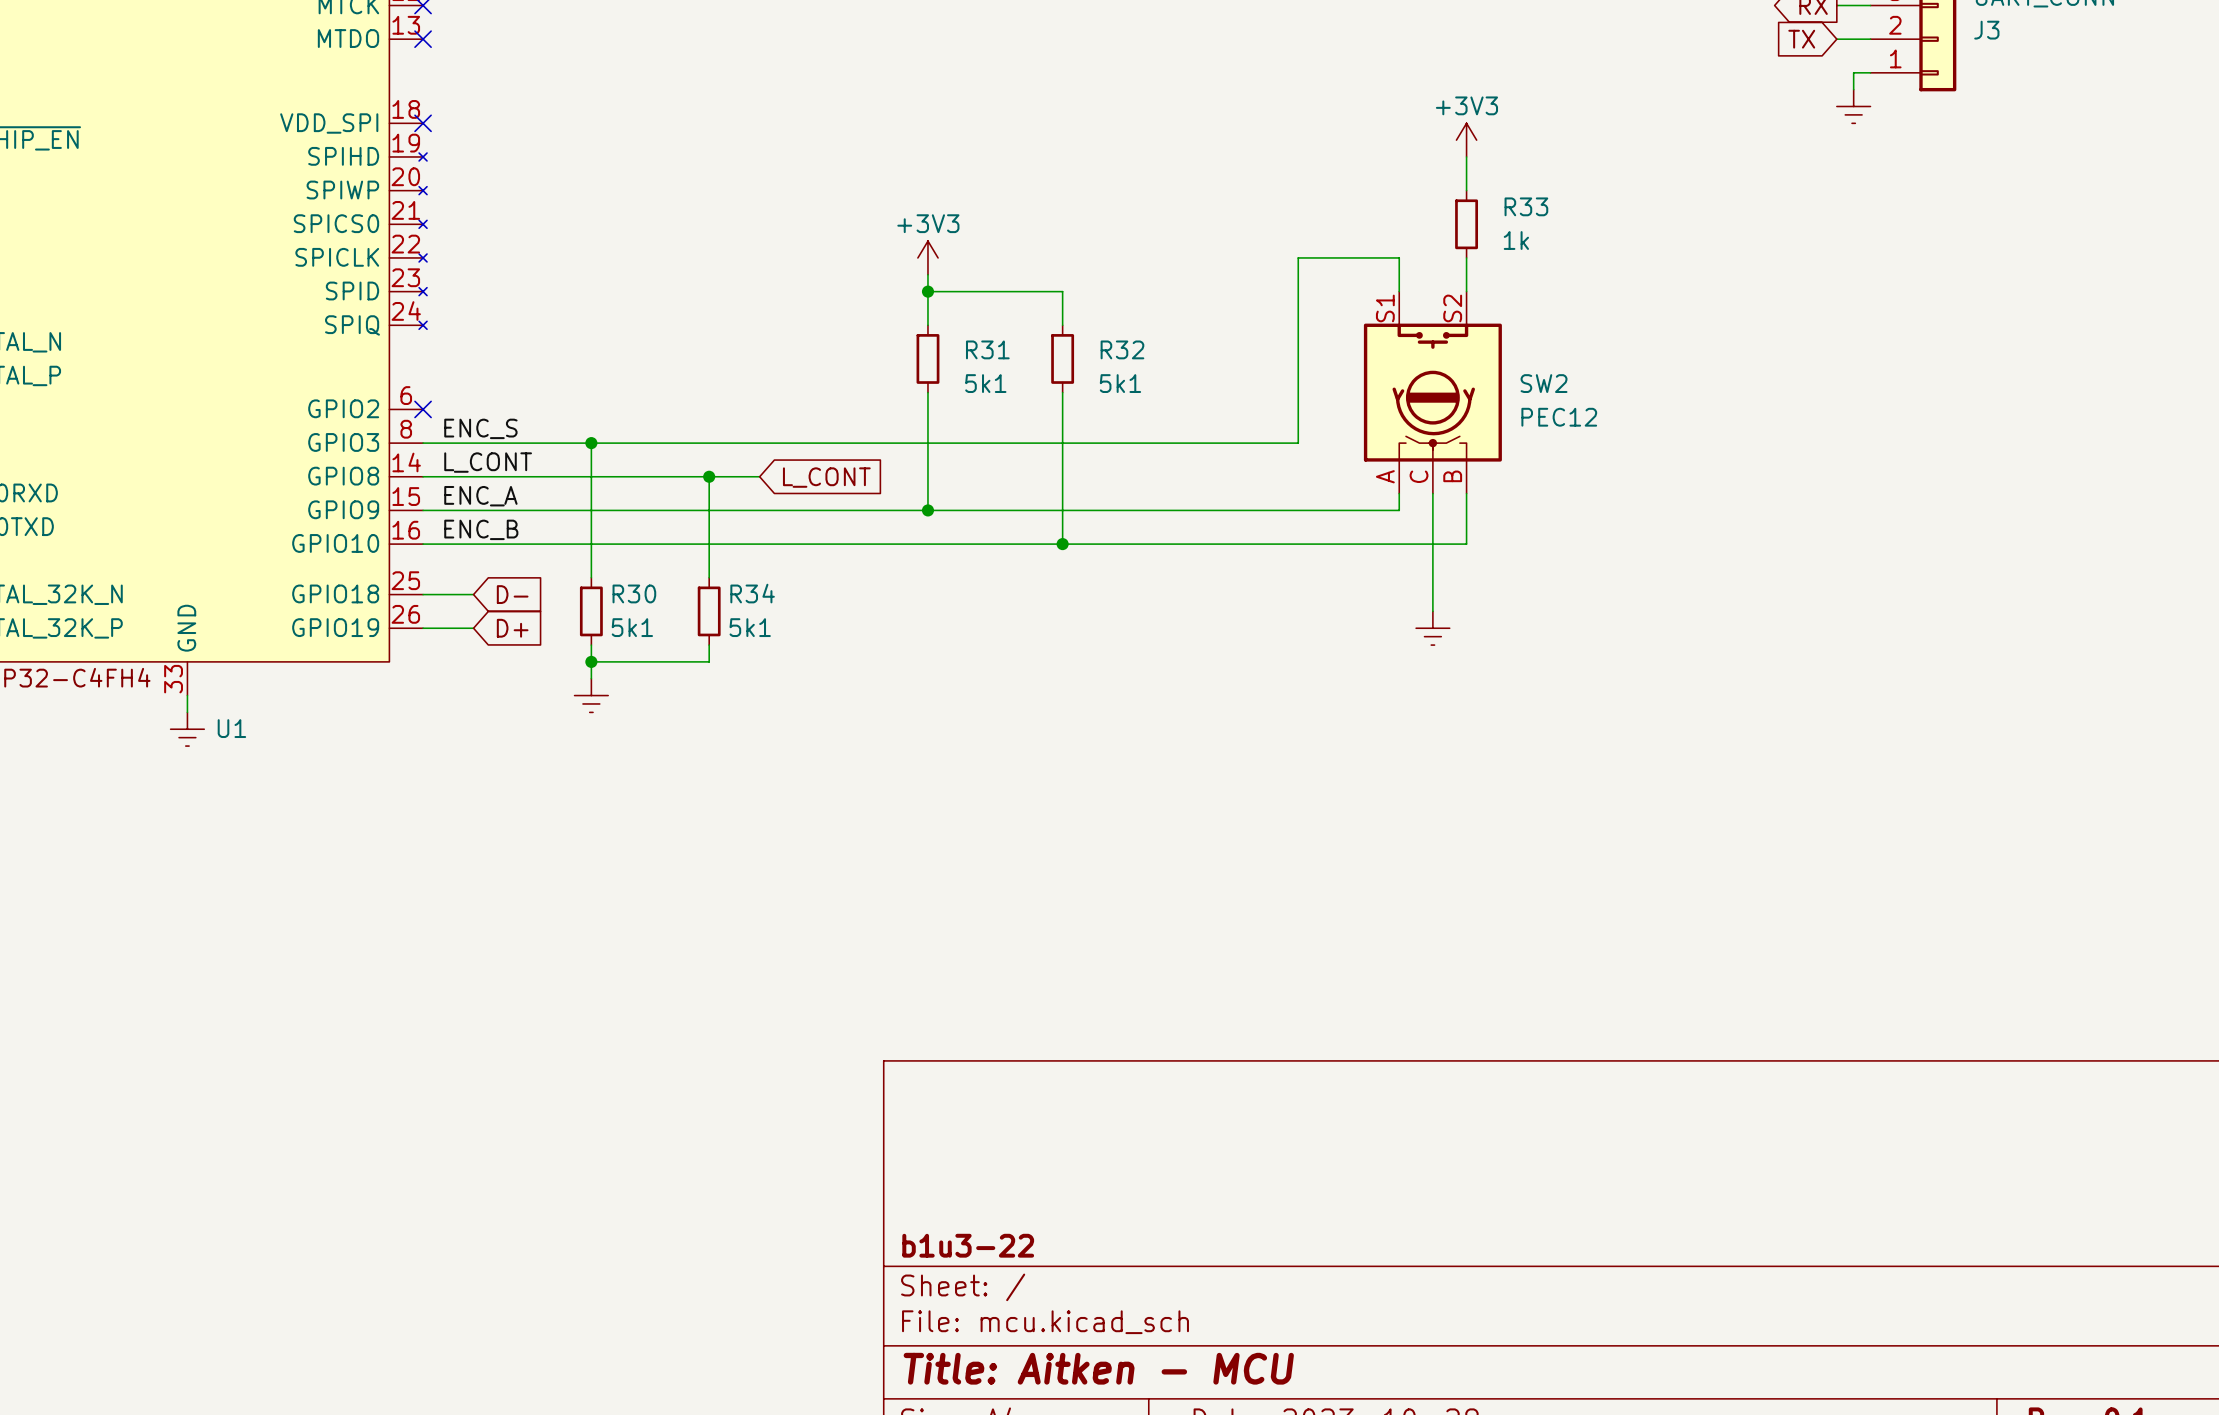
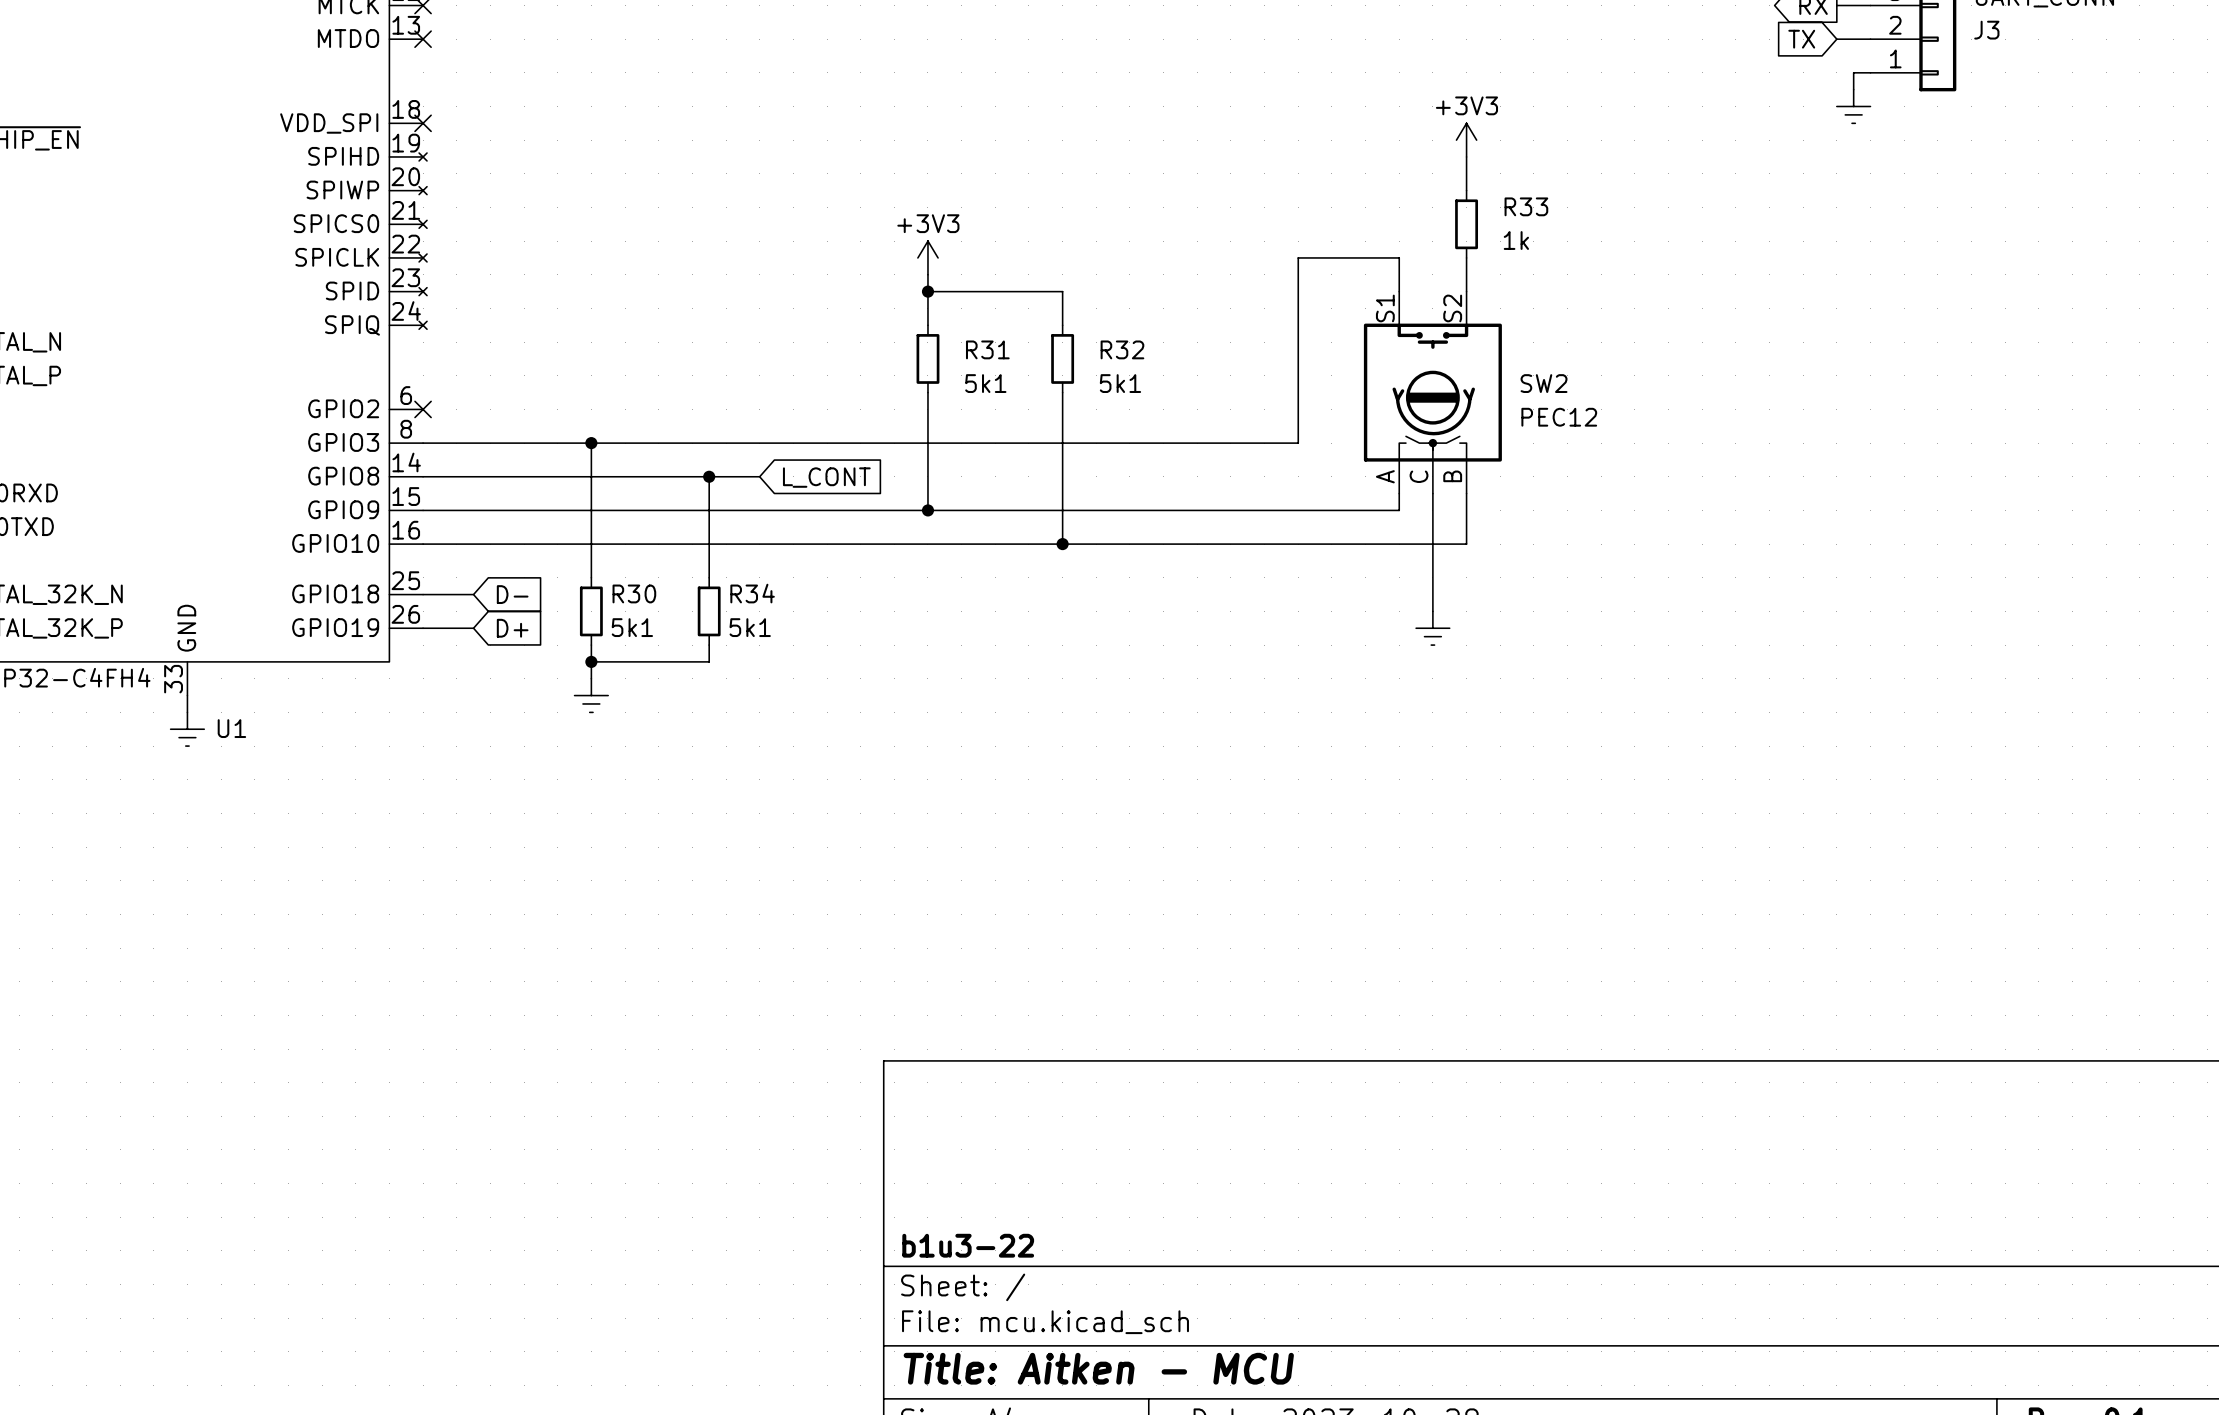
label: ENC_S (480, 428) -> none
label: L_CONT (488, 462) -> none
label: ENC_A (480, 496) -> none
label: ENC_B (481, 529) -> none

